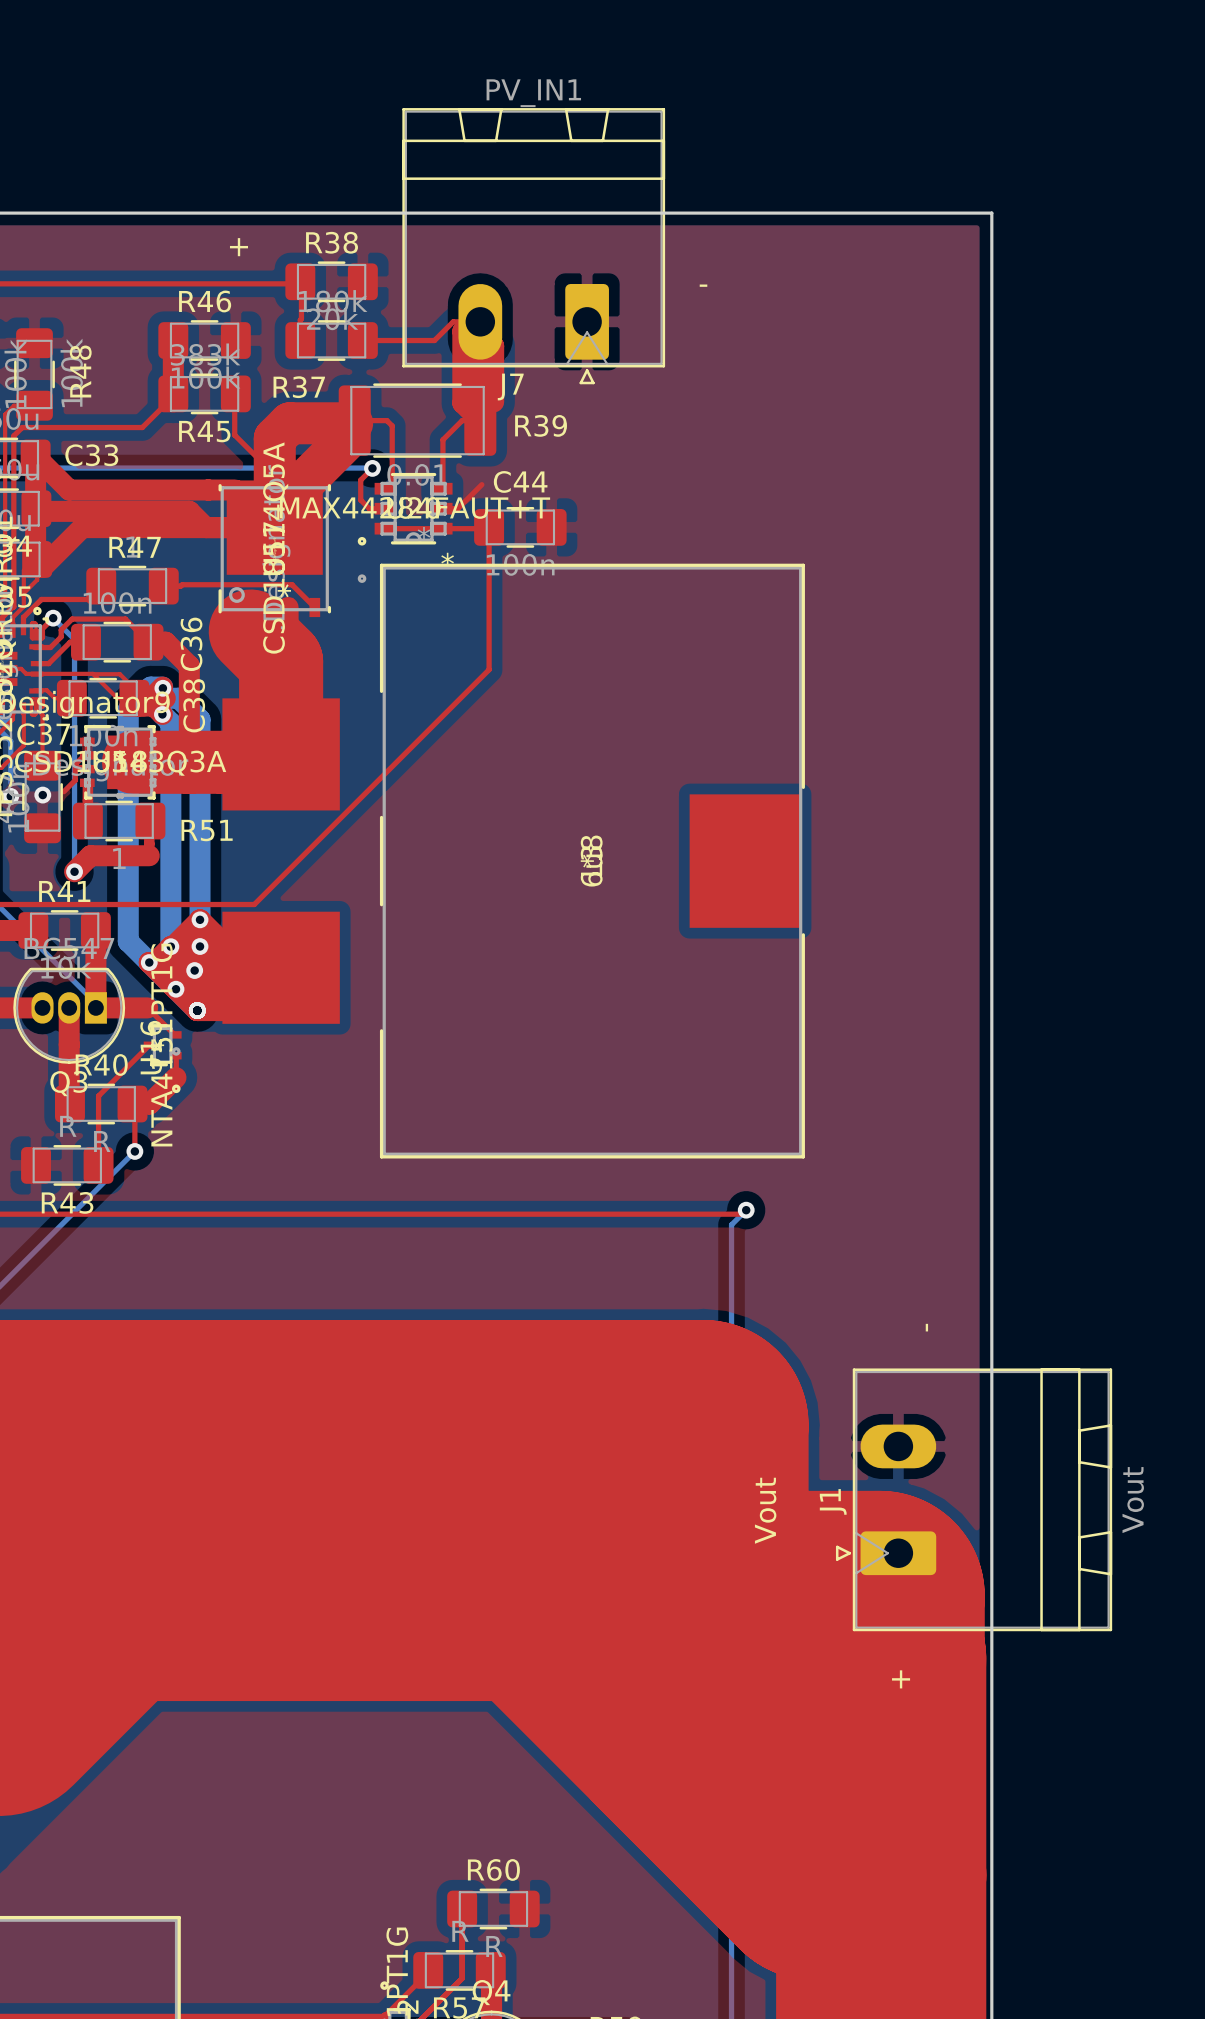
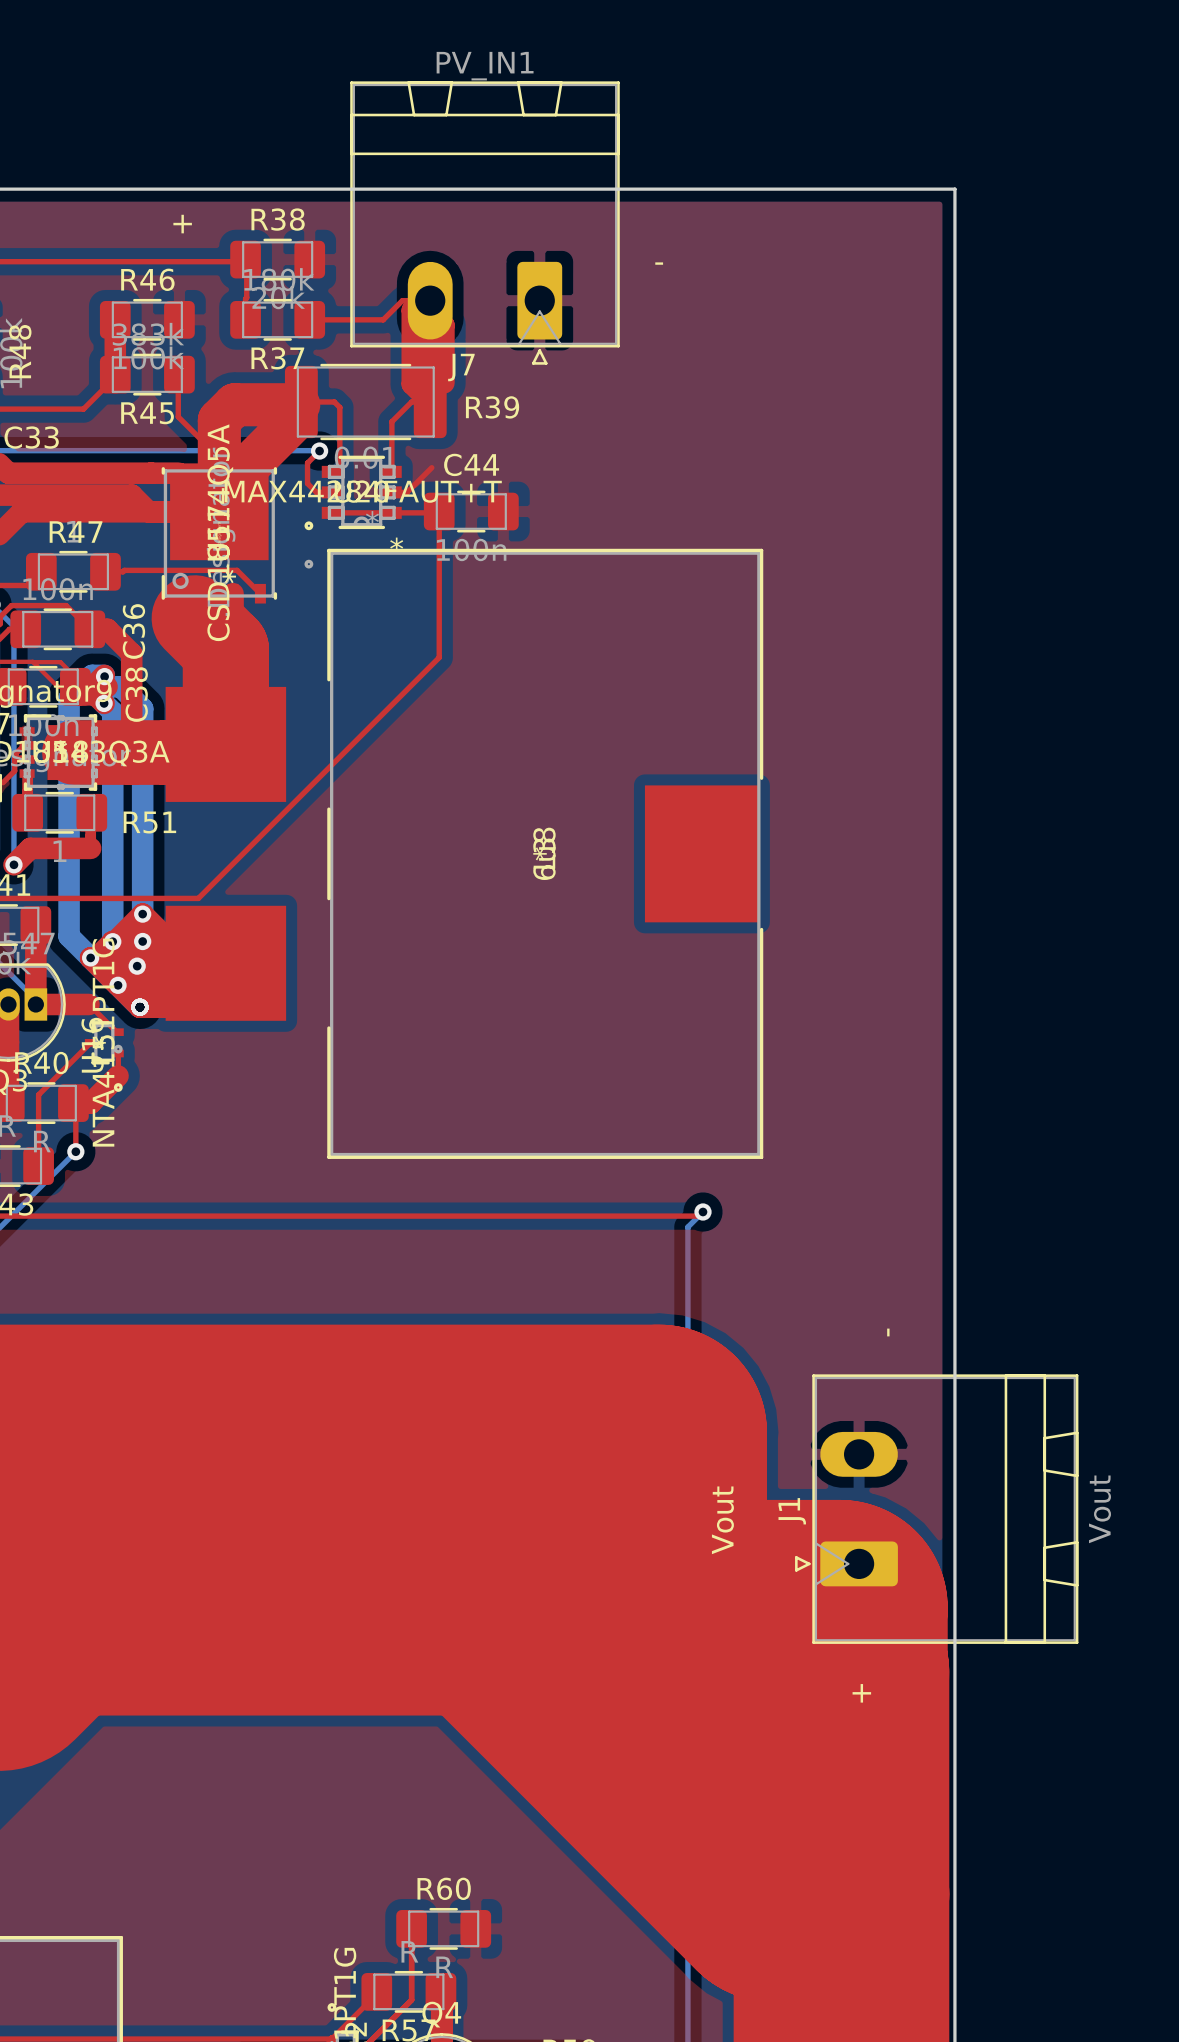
R37 name position: R37 (299, 387) -> R37 (277, 358)

